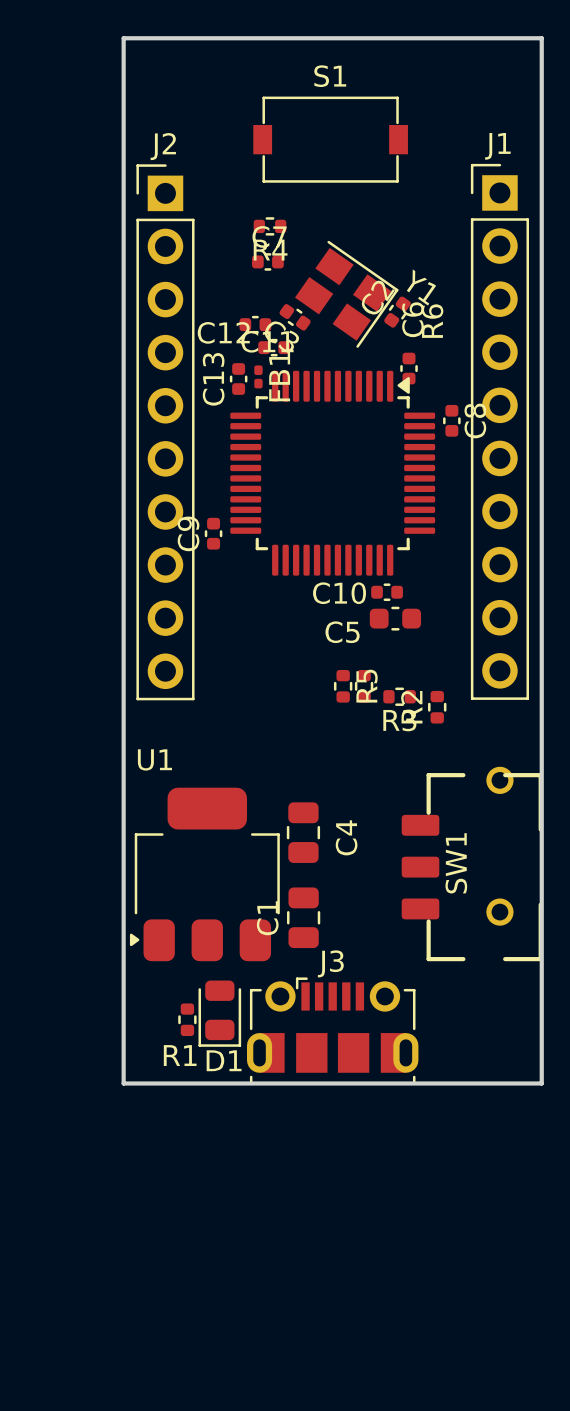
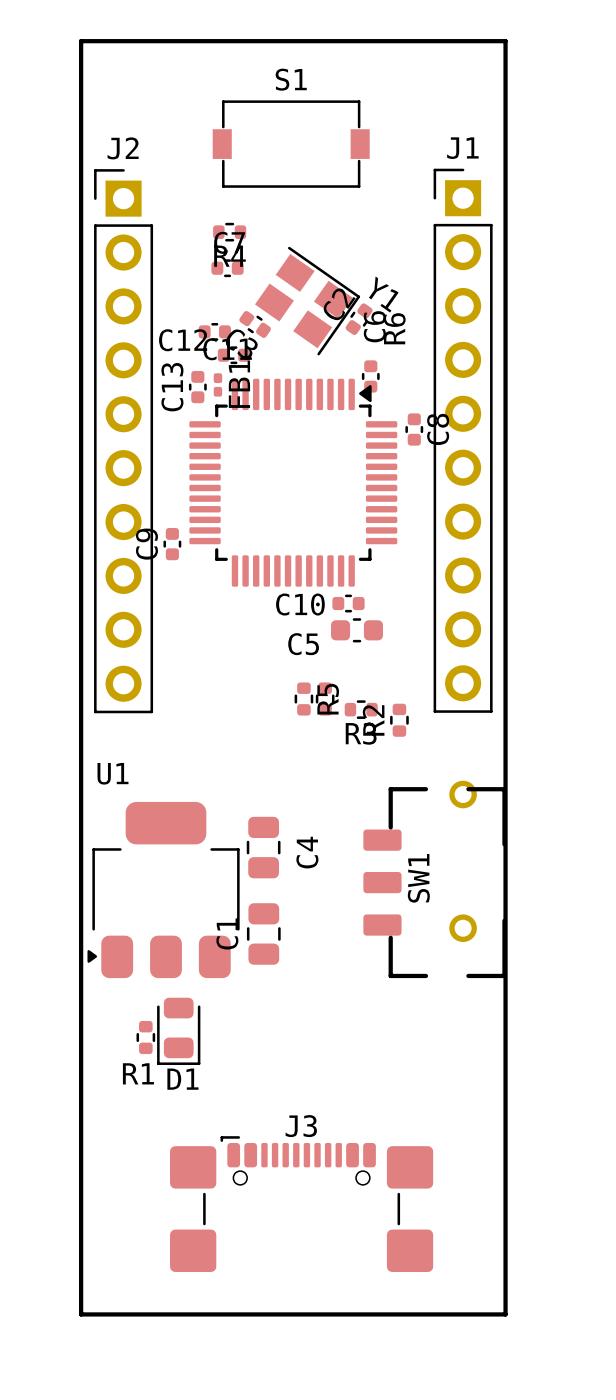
J3 footprint: [247, 977, 419, 1084] -> [170, 1136, 434, 1273]
board edge: (123, 1083) (541, 1083) -> (81, 1102) (81, 1314) (505, 1314) (505, 1102)

